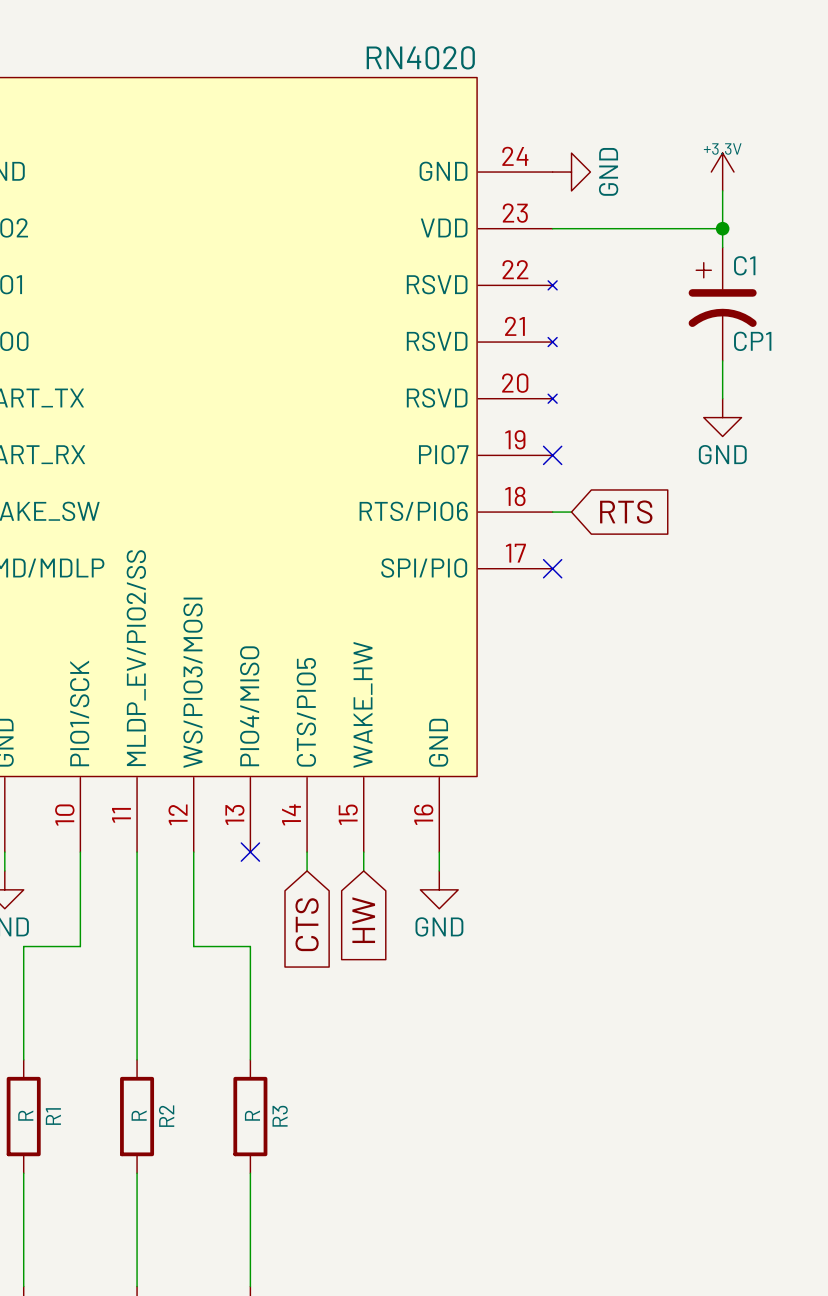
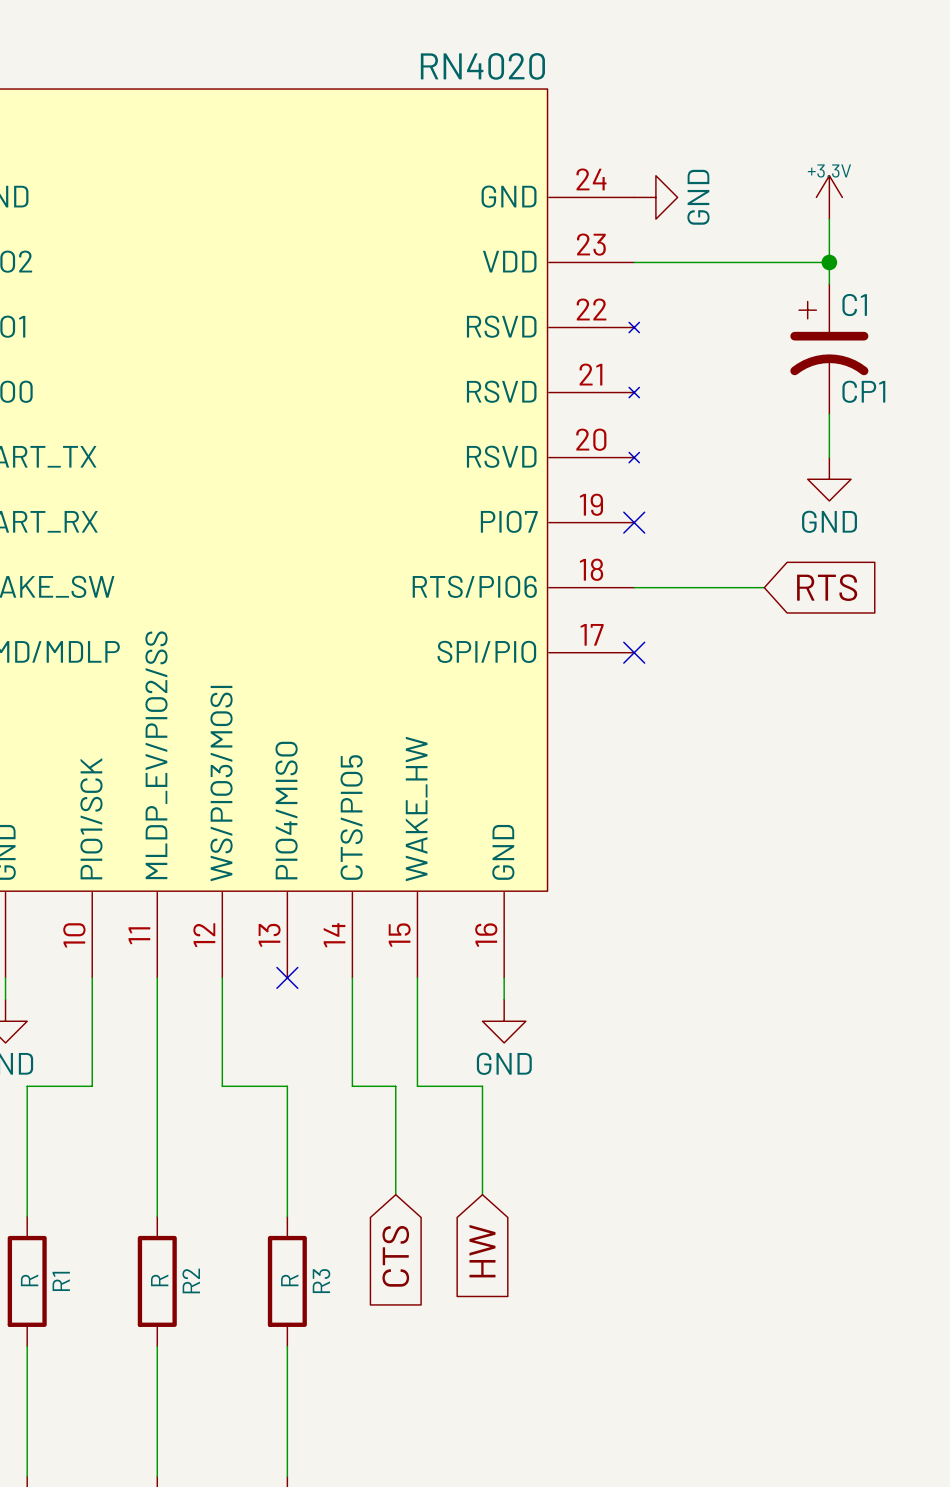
wire: none -> (655, 587) (764, 587)
global label position: RTS (626, 512) -> RTS (827, 587)
wire: none -> (352, 999) (352, 1086) (395, 1086) (395, 1194)
wire: none -> (417, 999) (417, 1086) (482, 1086) (482, 1194)
global label position: HW (363, 920) -> HW (482, 1251)
global label position: CTS (307, 924) -> CTS (395, 1256)

